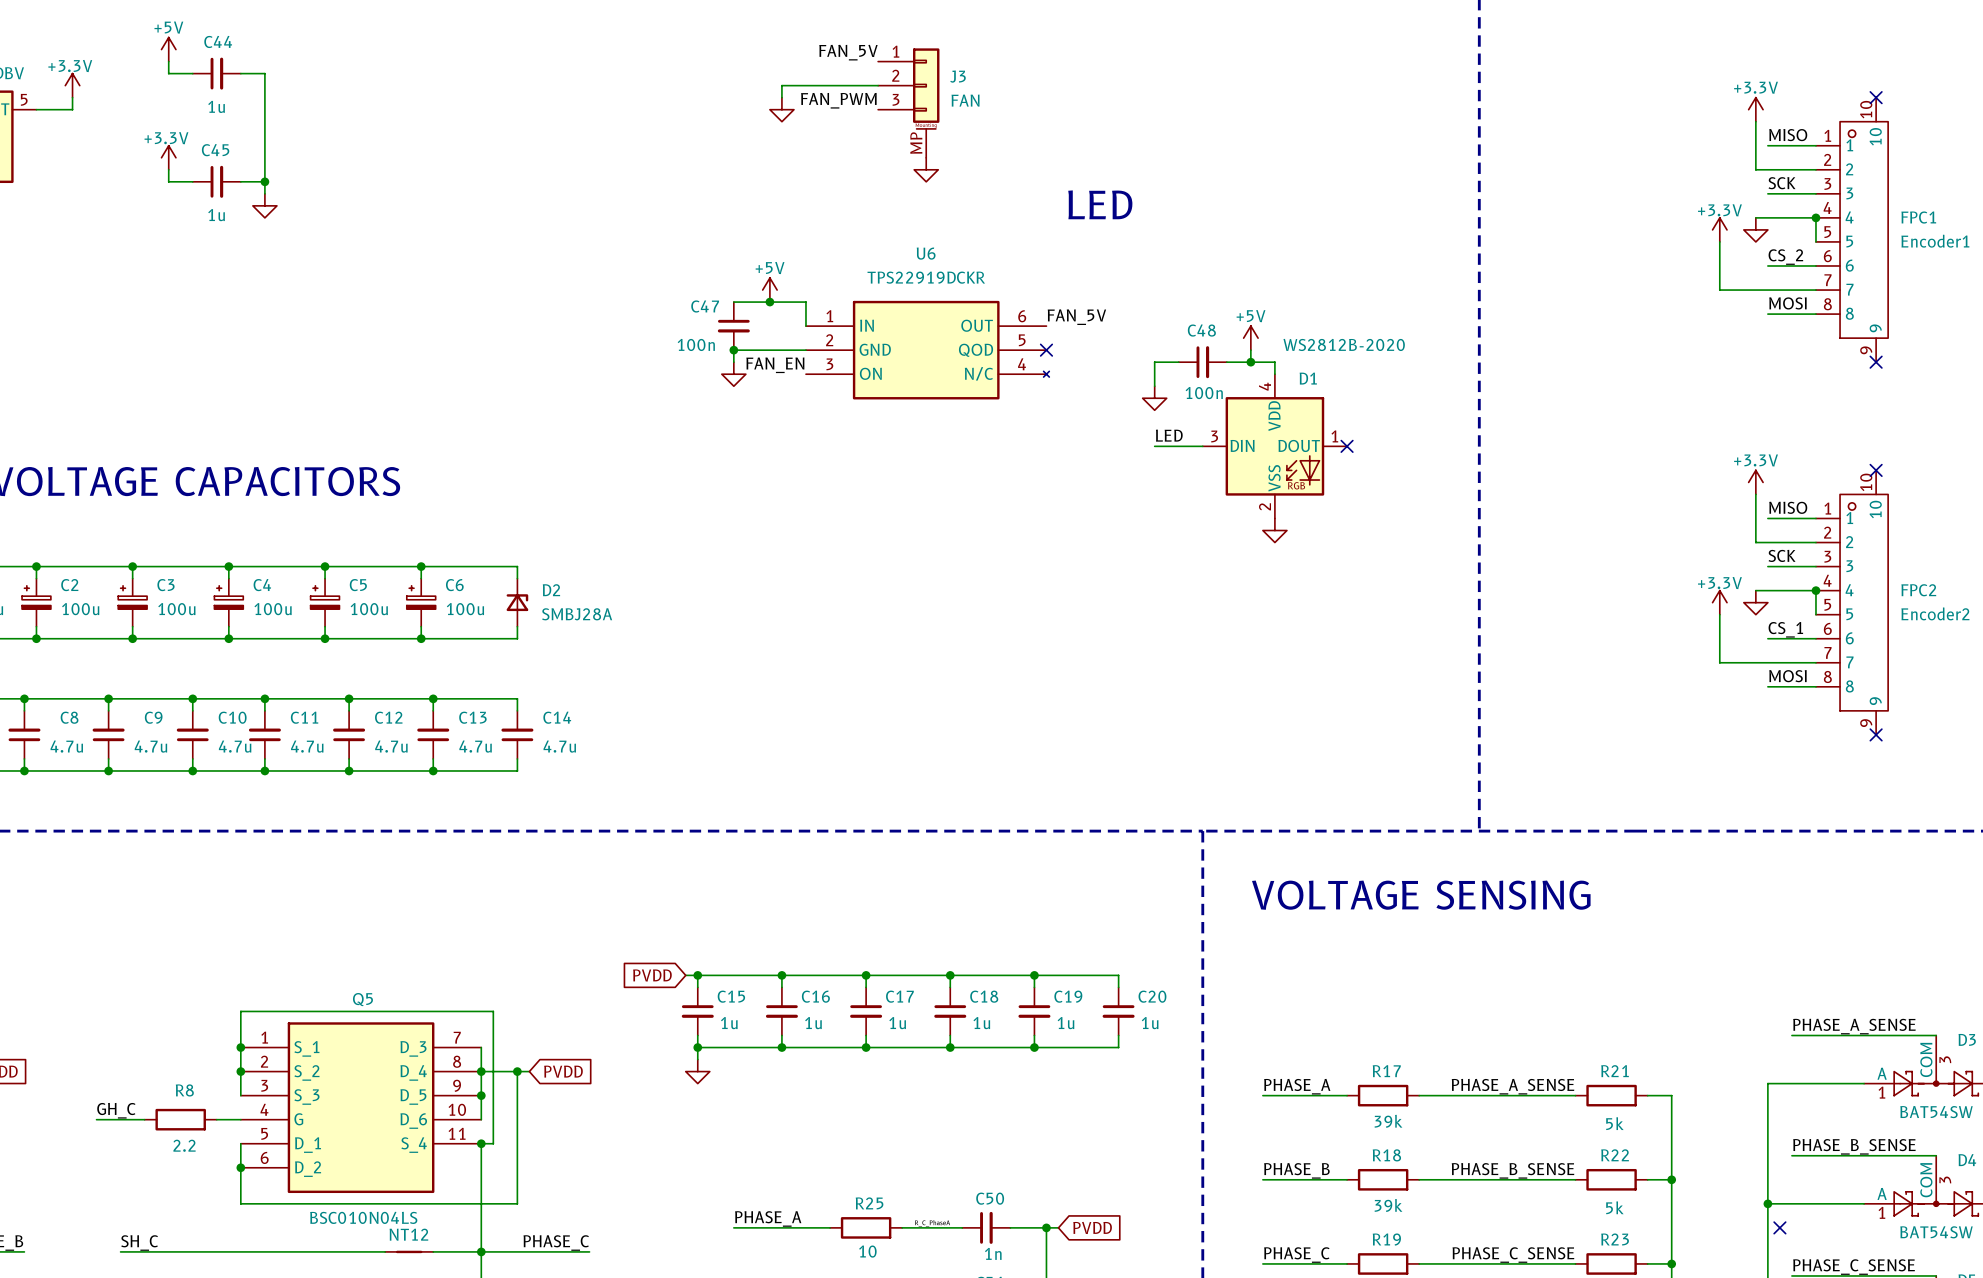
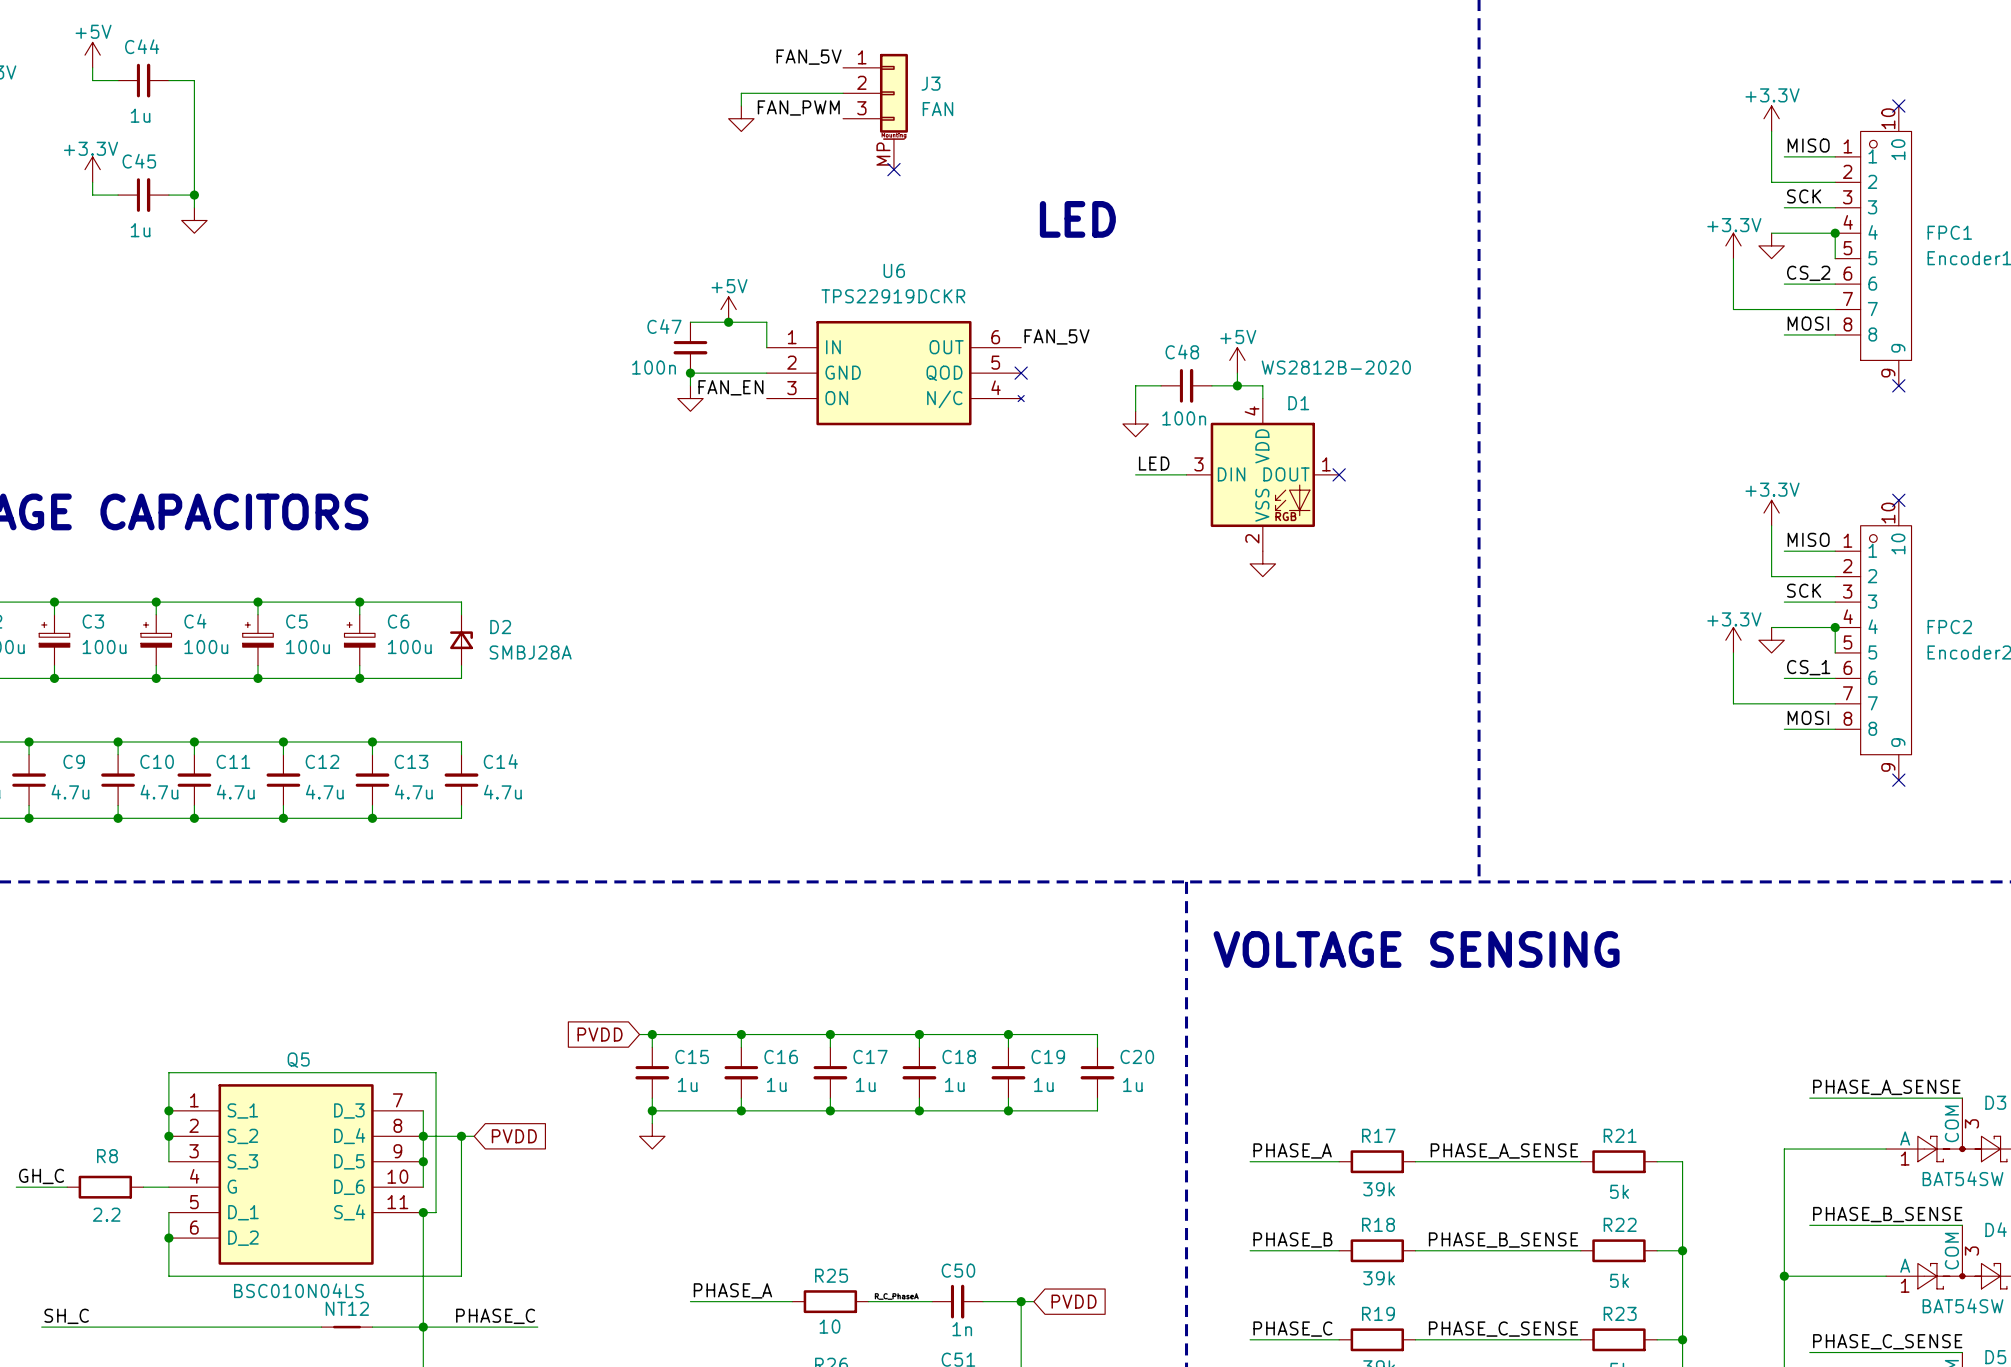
no-connect mark: none -> (893, 169)
power symbol: (926, 169) -> none
no-connect mark: (1779, 1227) -> none

